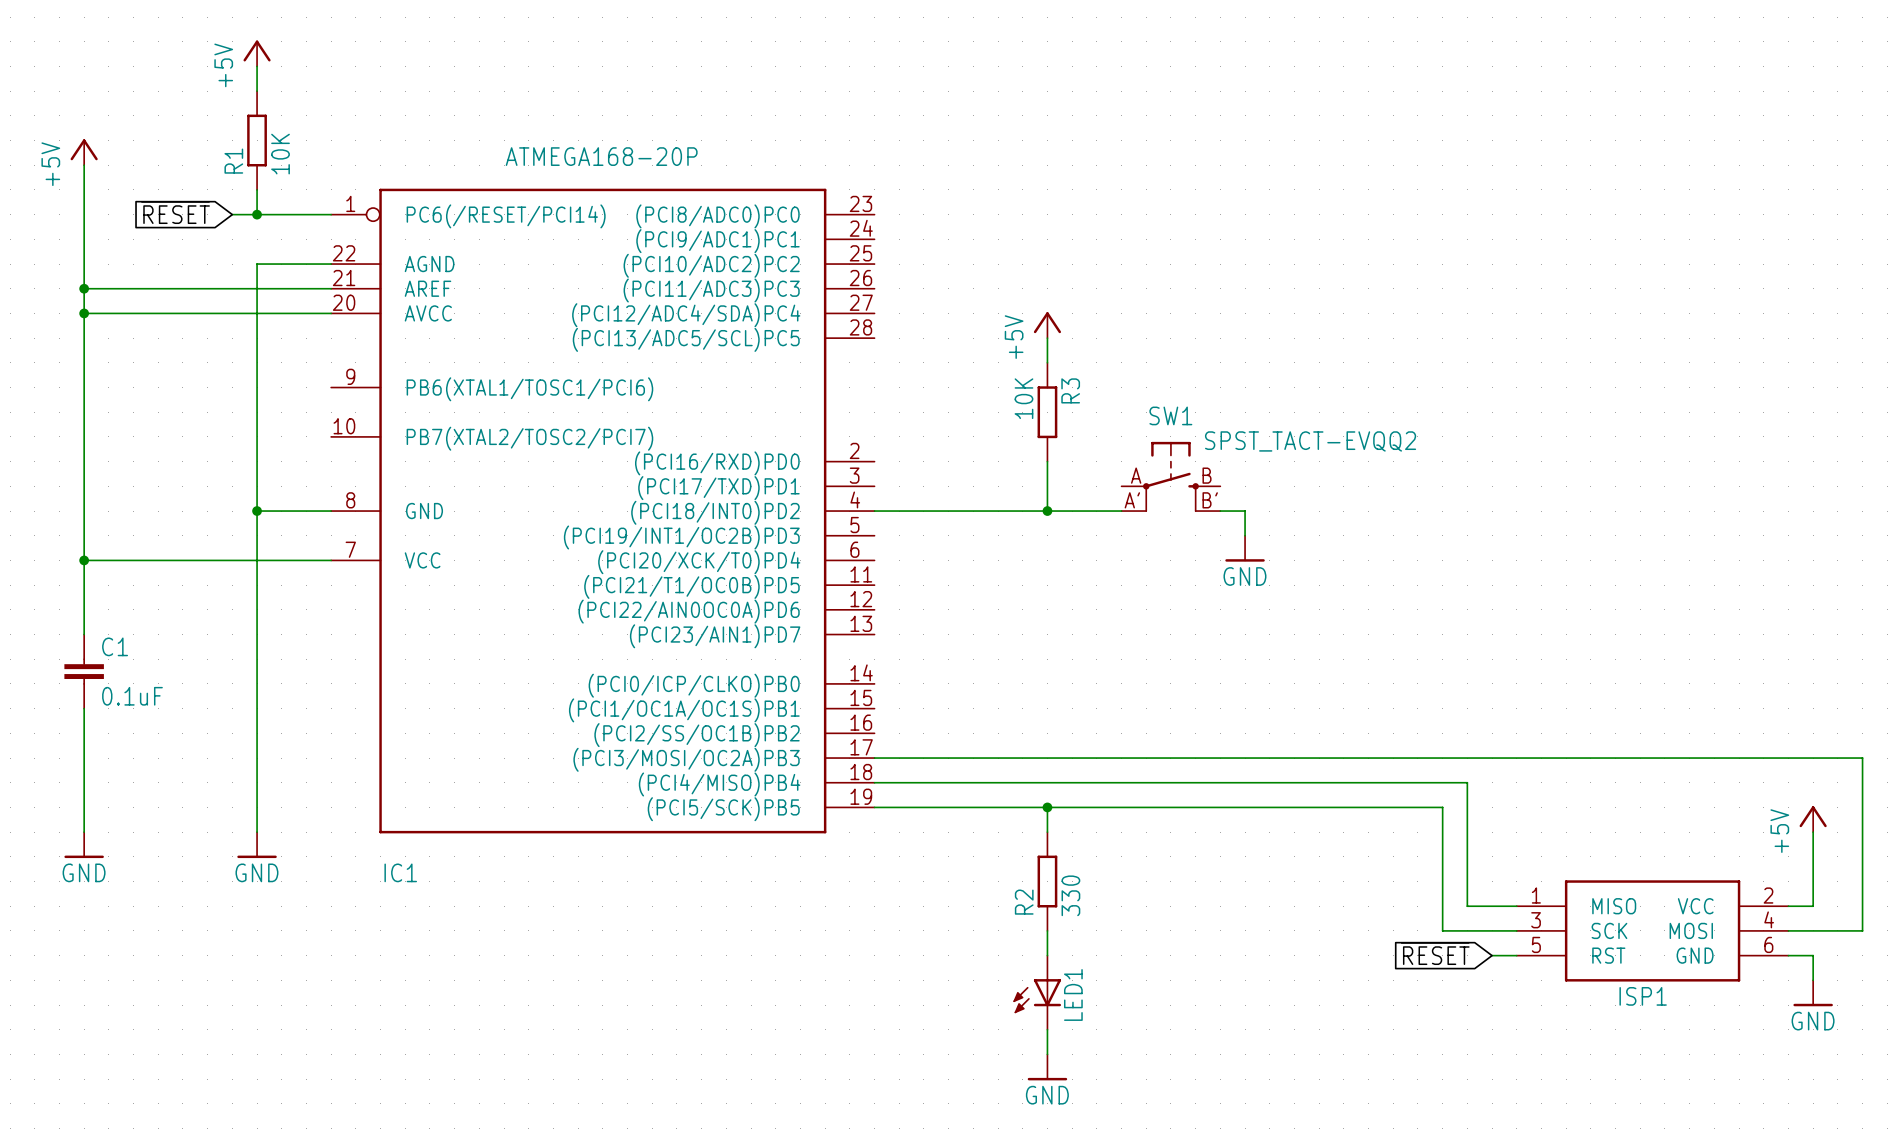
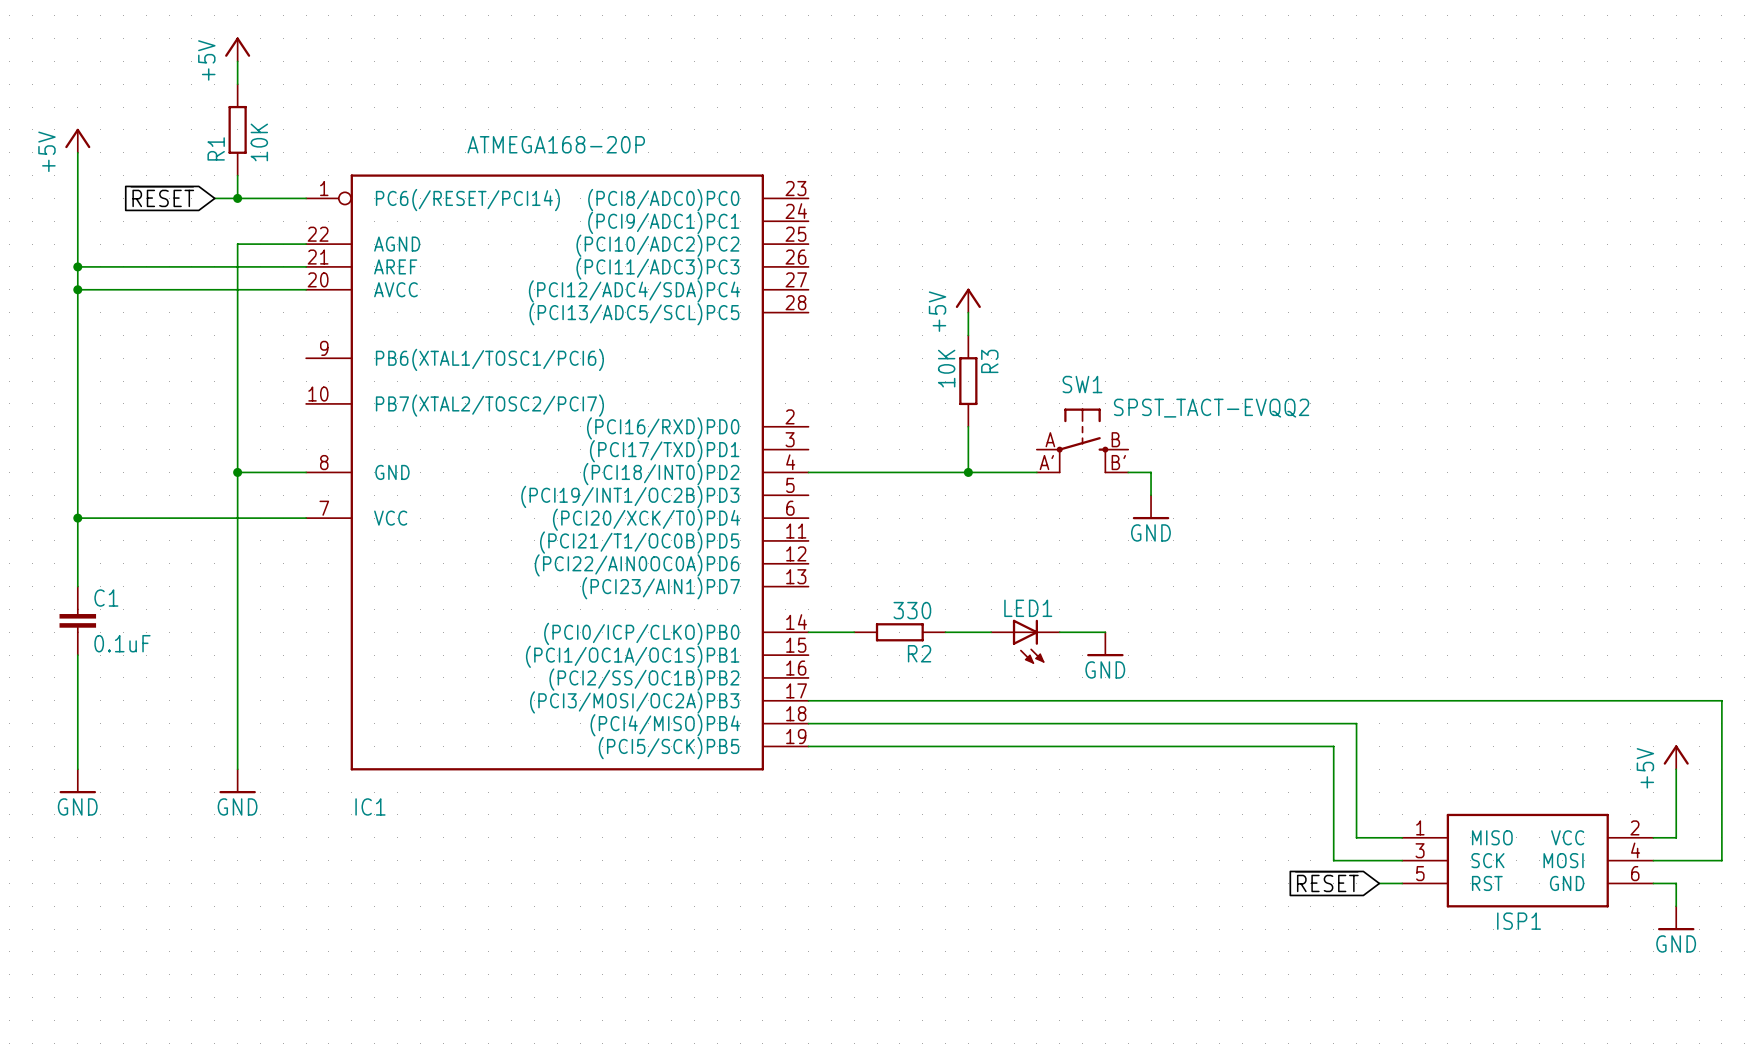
wire: none -> (808, 632) (854, 632)
wire: none -> (945, 632) (991, 632)
wire: none -> (1059, 632) (1105, 632)
power symbol: none -> GND (1105, 644)
wire: (1047, 807) (1047, 832) -> none
junction: (1047, 807) -> none
R2 rotation: 0° (1047, 881) -> 90° clockwise (899, 632)
R2 position: (1047, 881) -> (899, 632)
R2 value position: 330 (1070, 895) -> 330 (912, 610)
R2 name position: R2 (1024, 902) -> R2 (919, 653)
wire: (1047, 930) (1047, 955) -> none
LED1 position: (1037, 992) -> (1025, 641)
LED1 rotation: 0° (1037, 996) -> 90° counterclockwise (1028, 641)
wire: (1047, 1029) (1047, 1054) -> none
power symbol: GND (1047, 1067) -> none

